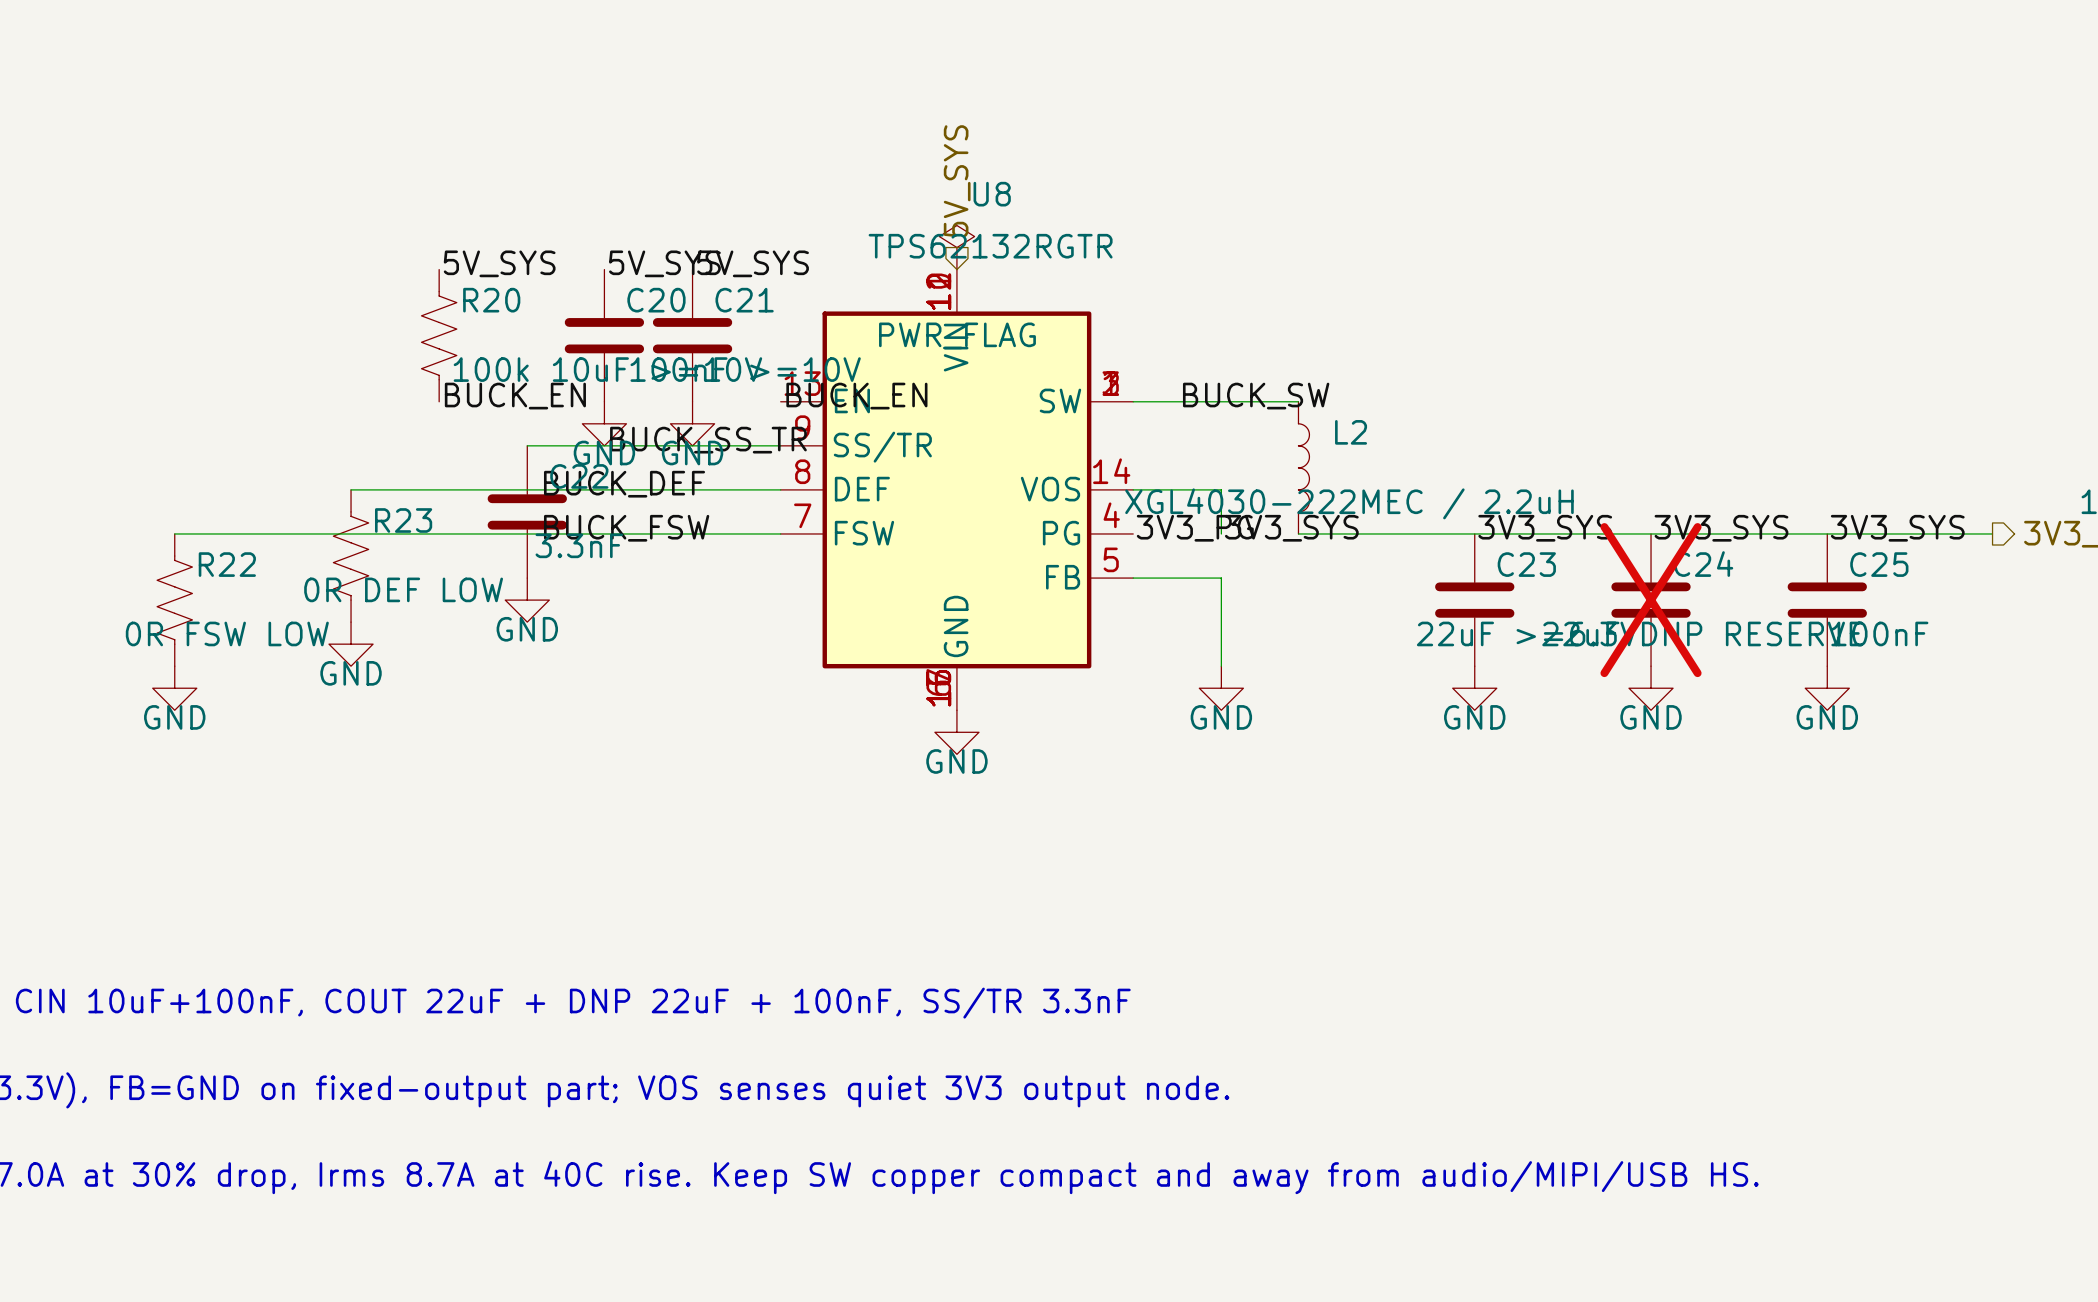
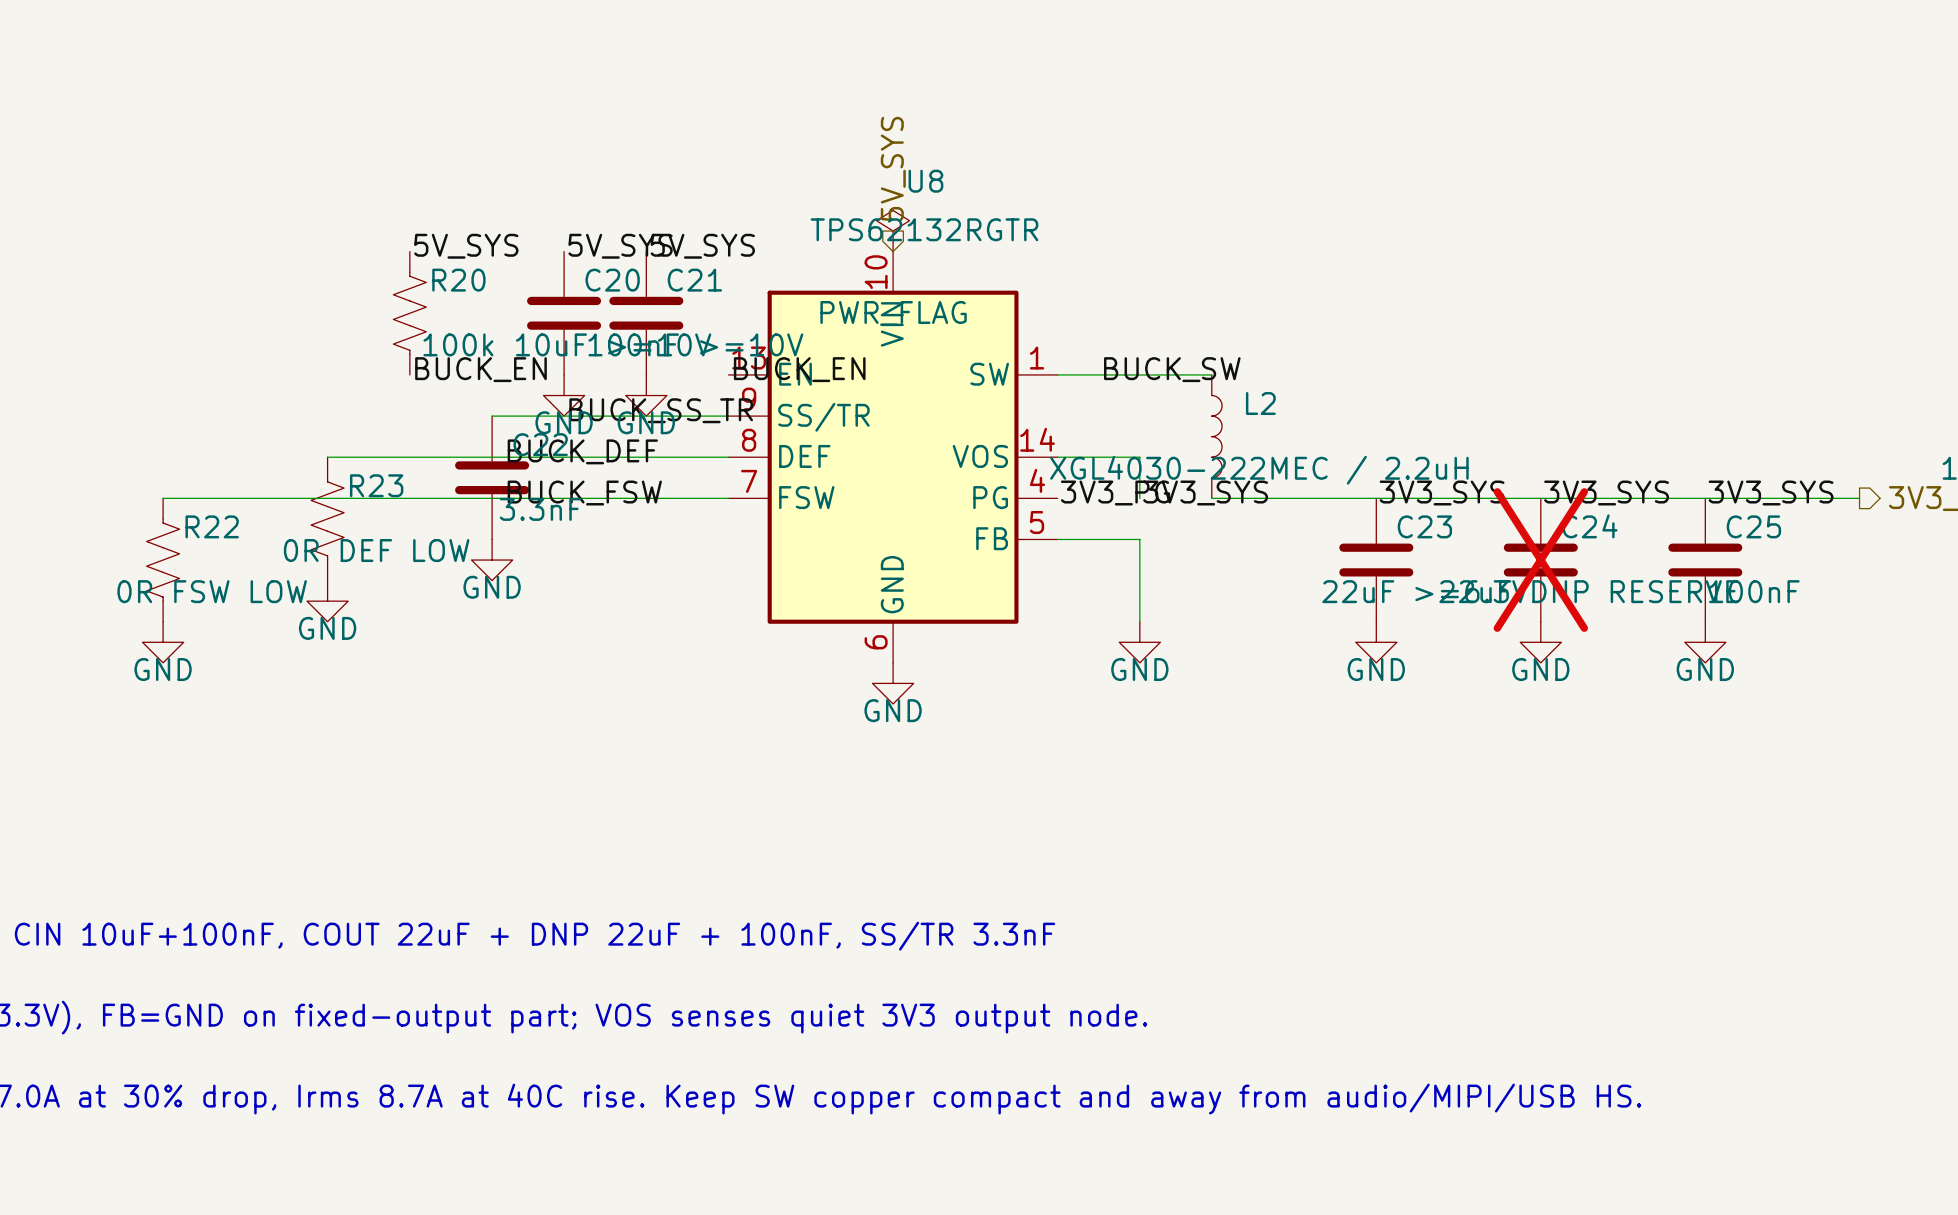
U8 symbol: [780, 269, 1134, 711] -> [728, 251, 1058, 663]

